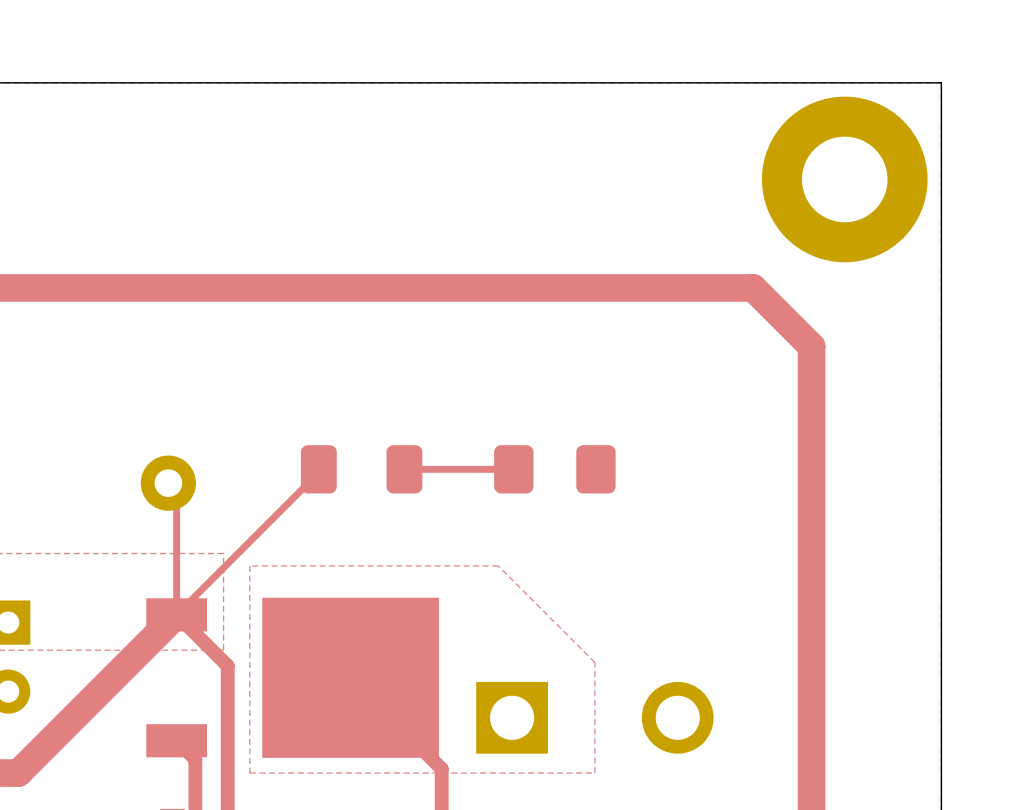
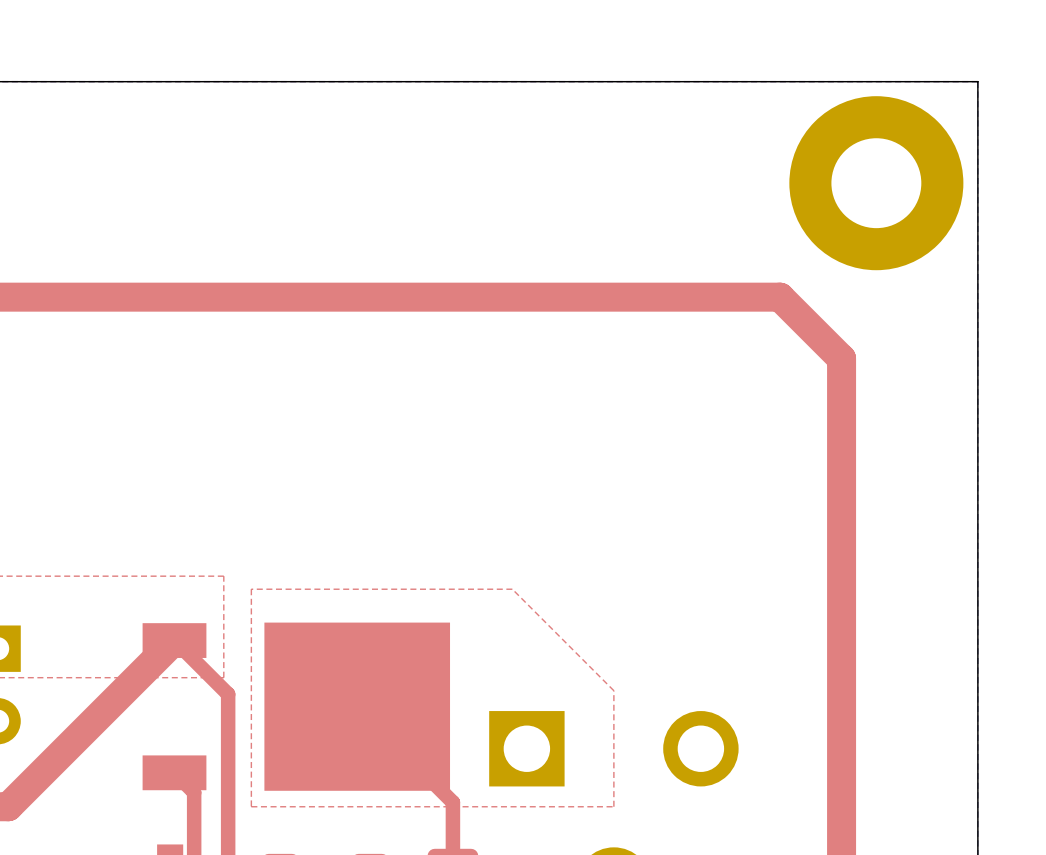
top track: (318, 469) (318, 472) (176, 614) (176, 491) (168, 483) -> none
part: (361, 469) -> none
top track: (513, 469) (404, 469) -> none
part: (554, 469) -> none
part: (168, 483) -> none

